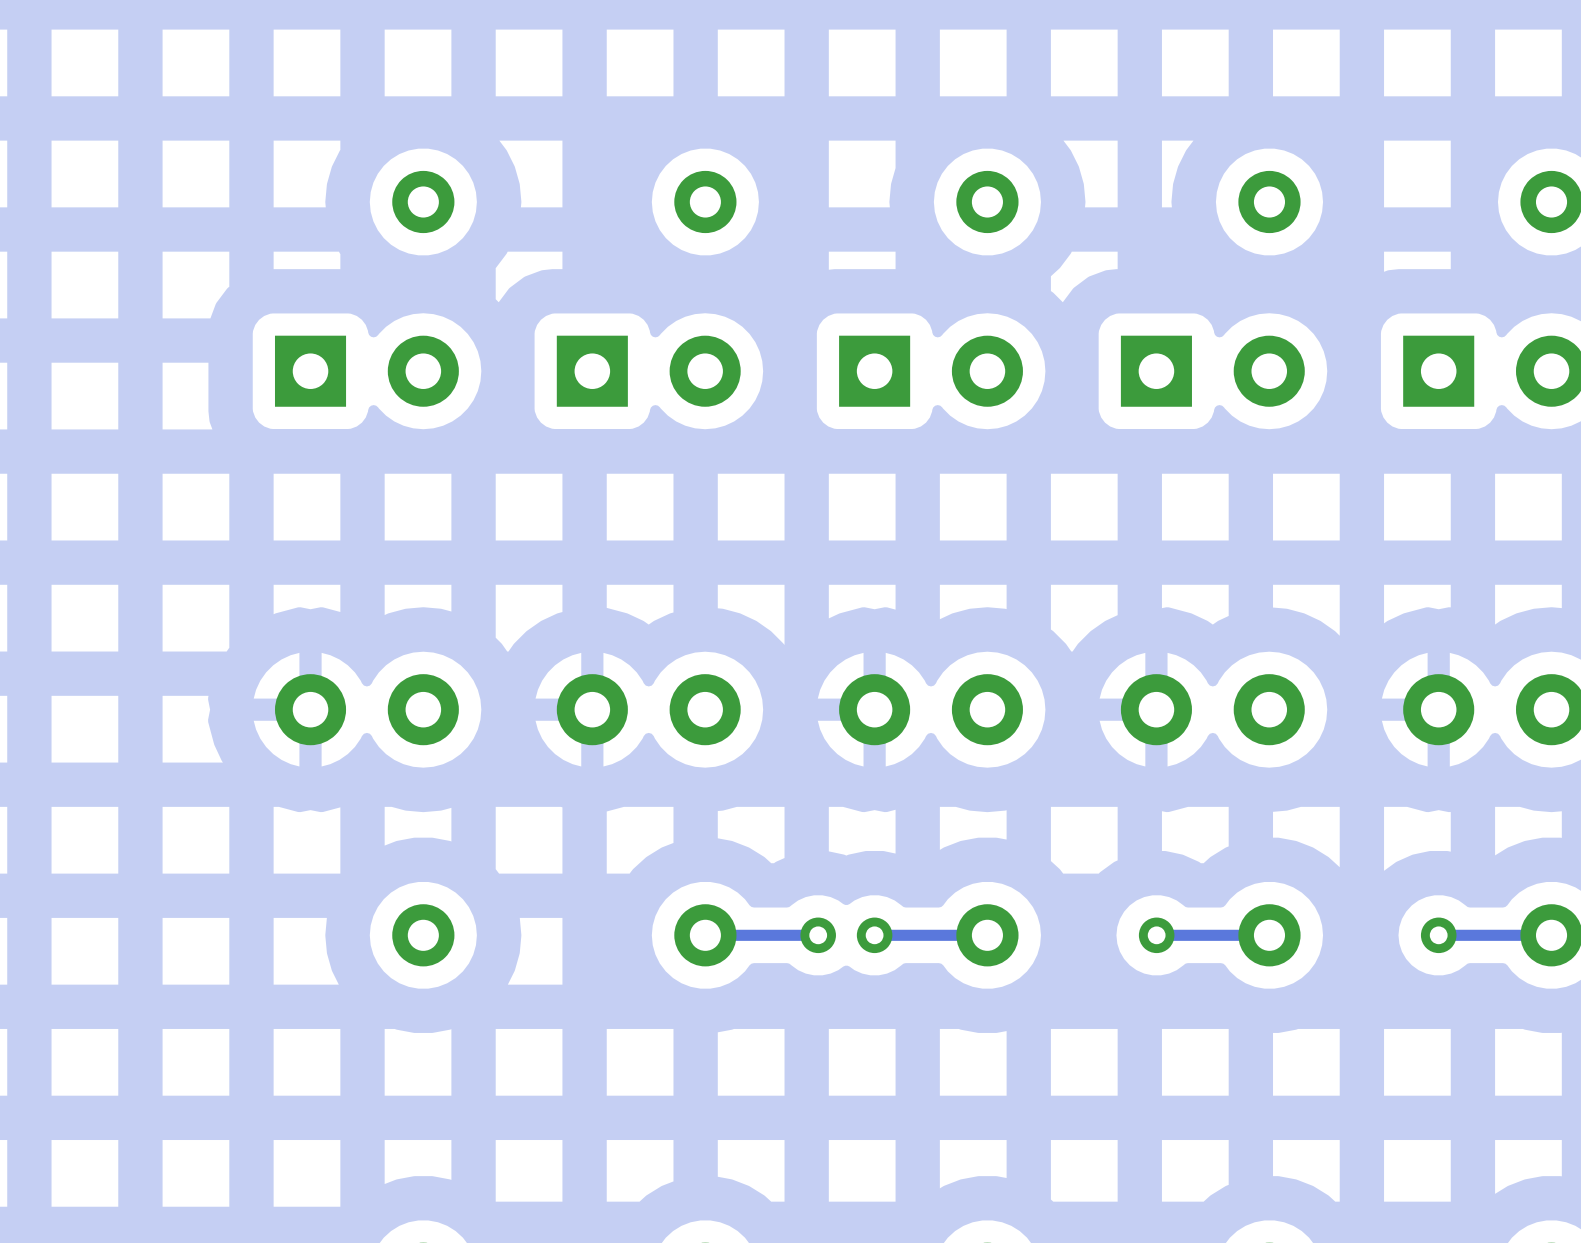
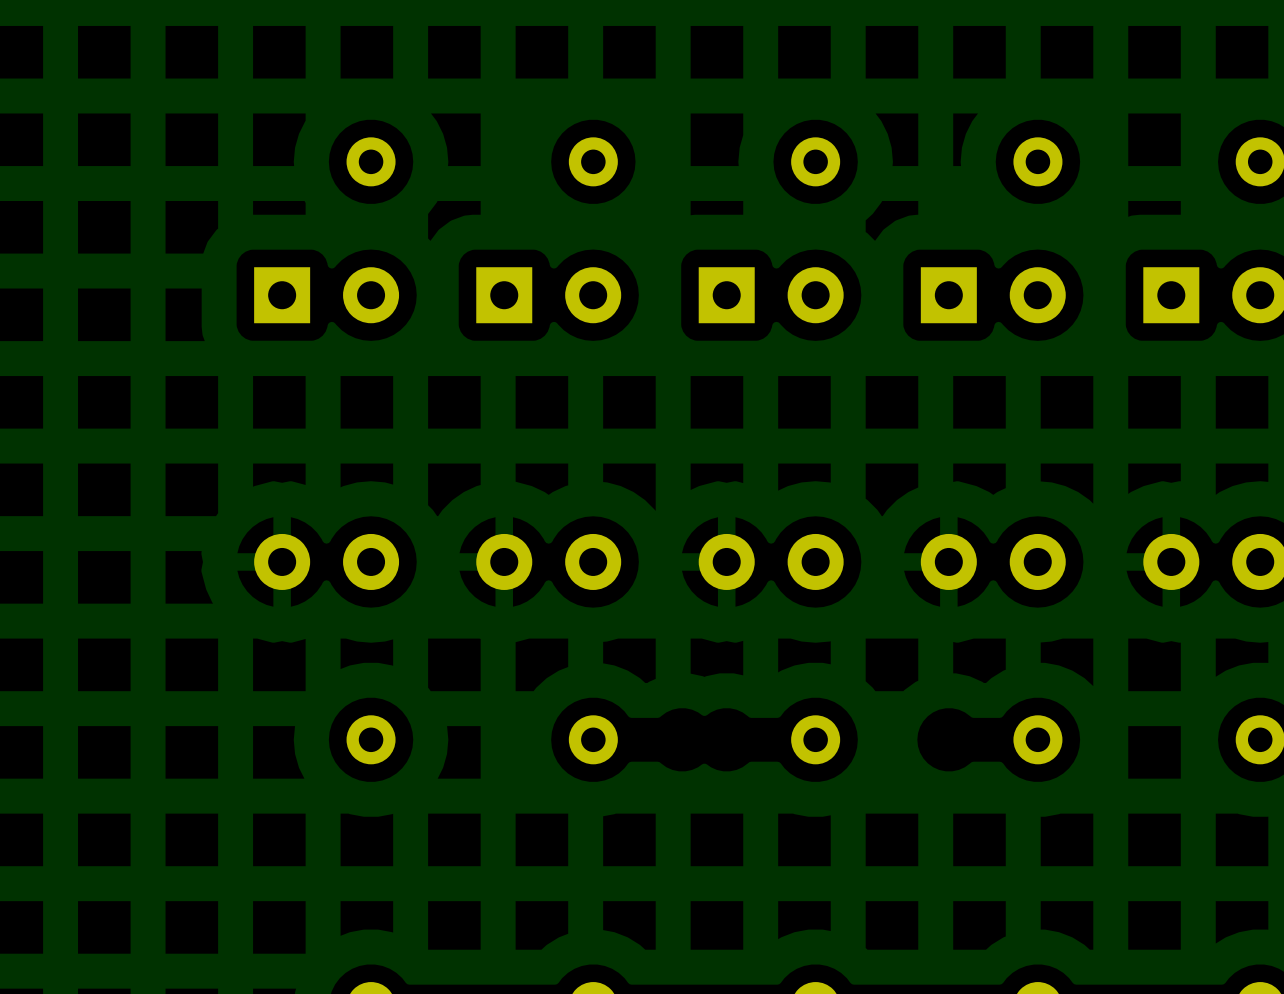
track: (818, 935) (705, 935) -> none
via: (818, 935) -> none
via: (874, 935) -> none
track: (987, 935) (874, 935) -> none
via: (1156, 935) -> none
track: (1269, 935) (1156, 935) -> none
via: (1438, 935) -> none
track: (1551, 935) (1438, 935) -> none

